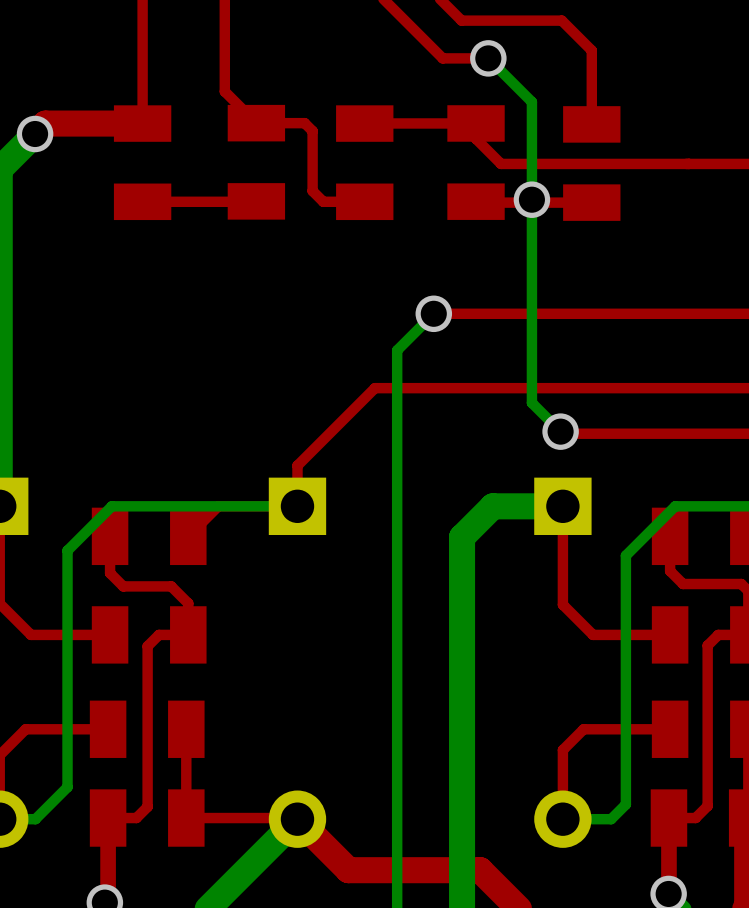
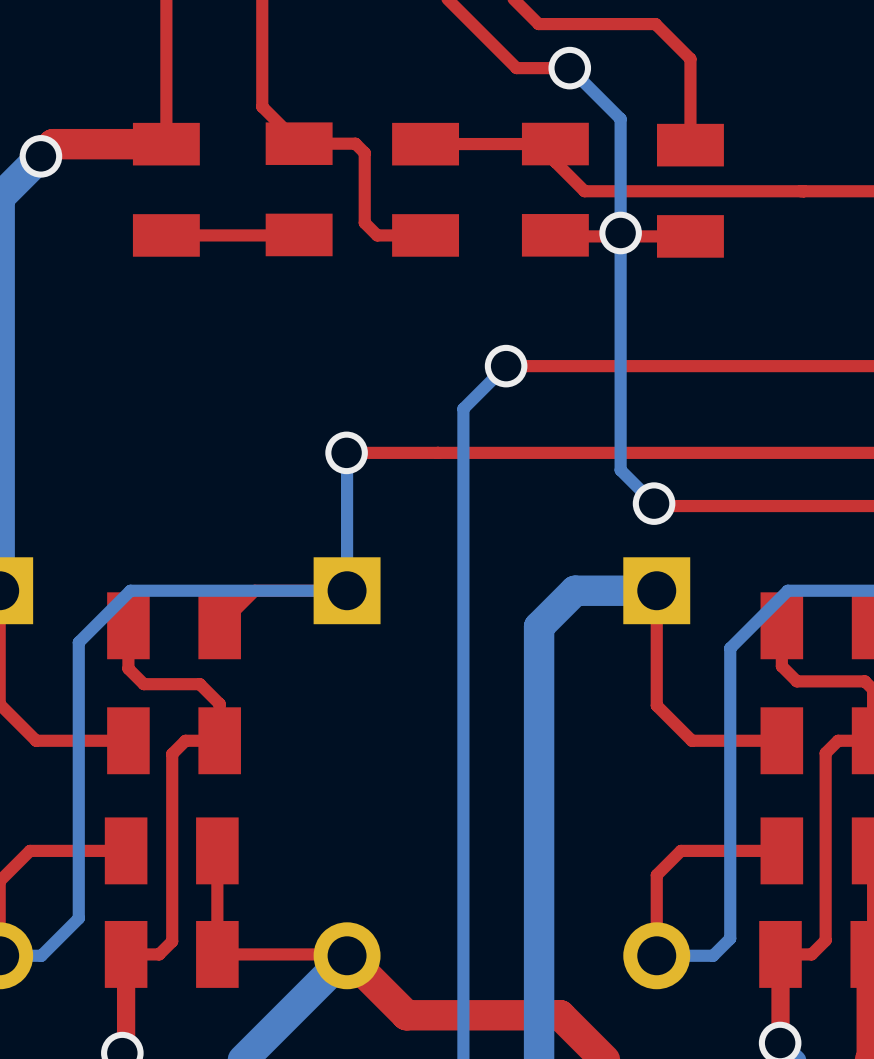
bottom track: none -> (347, 453) (347, 590)
via: none -> (346, 452)
top track: (374, 388) (297, 465) (297, 506) -> (437, 452) (346, 452)

